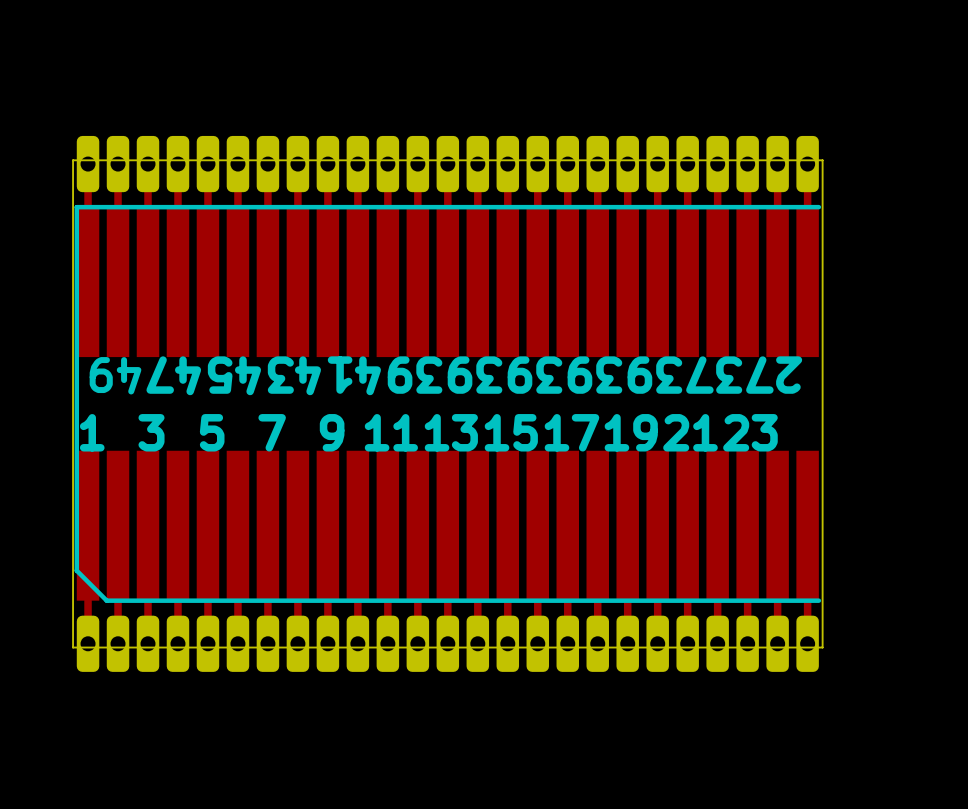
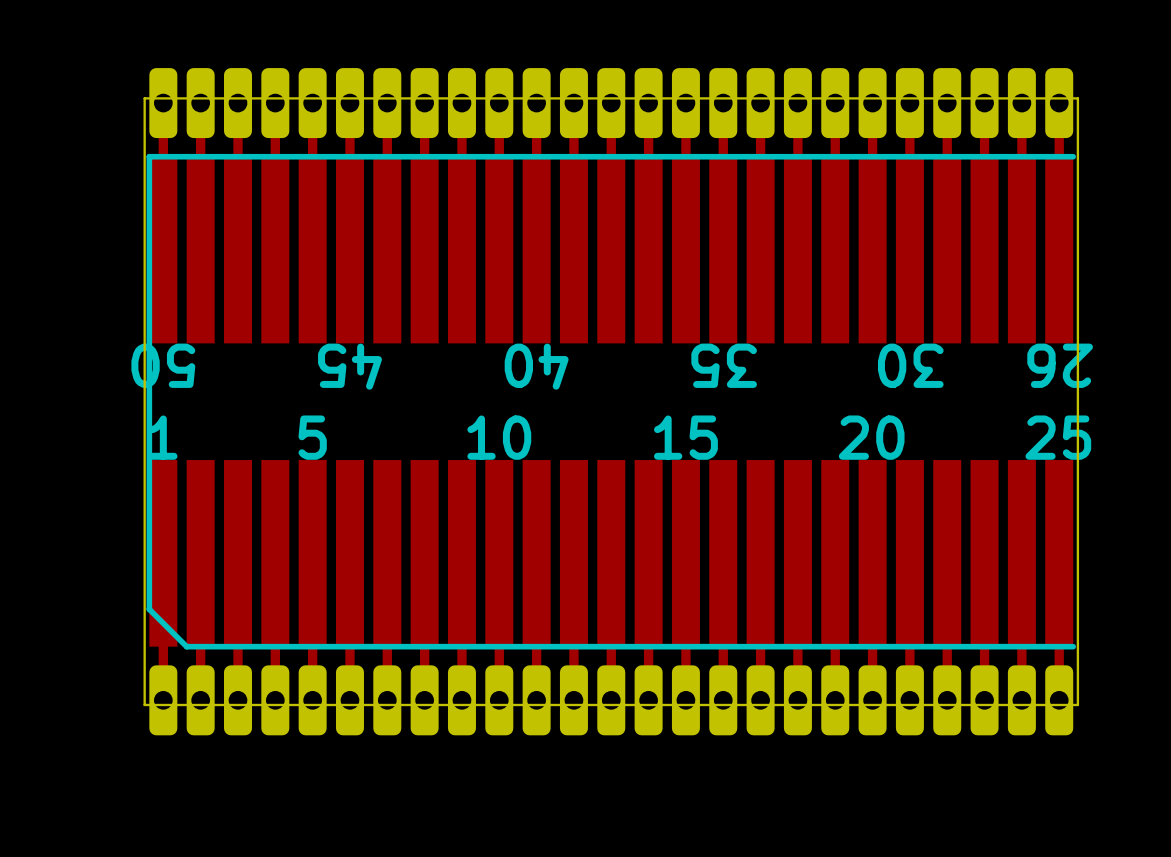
part footprint: [74, 135, 822, 672] -> [146, 68, 1077, 736]

